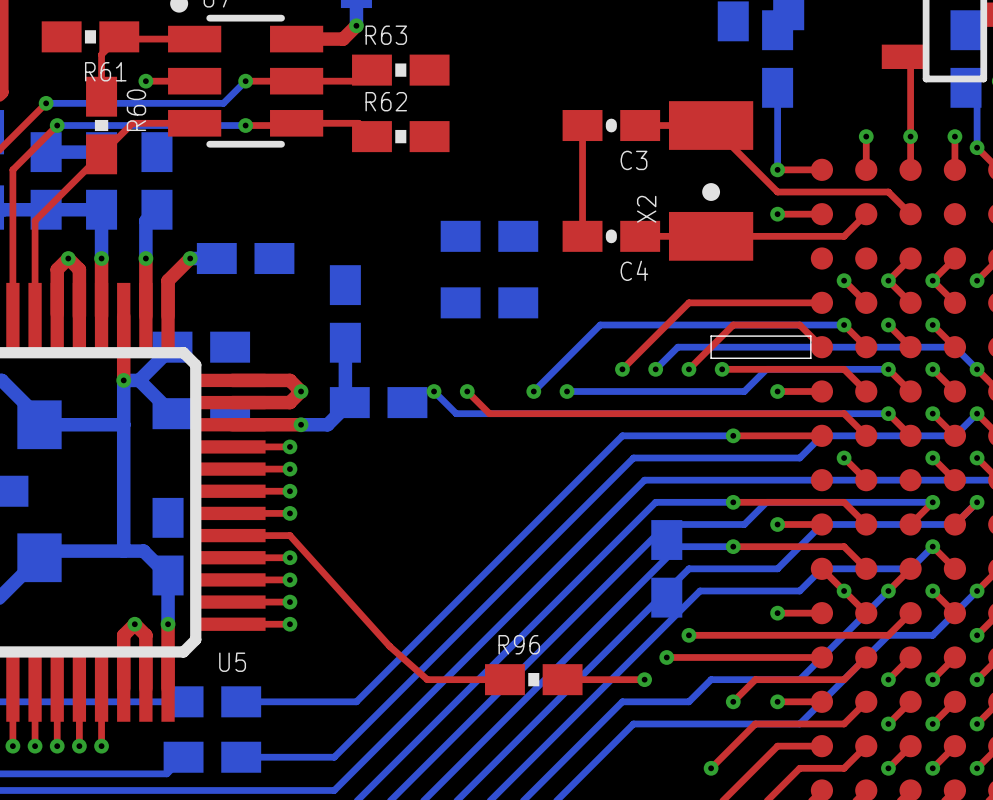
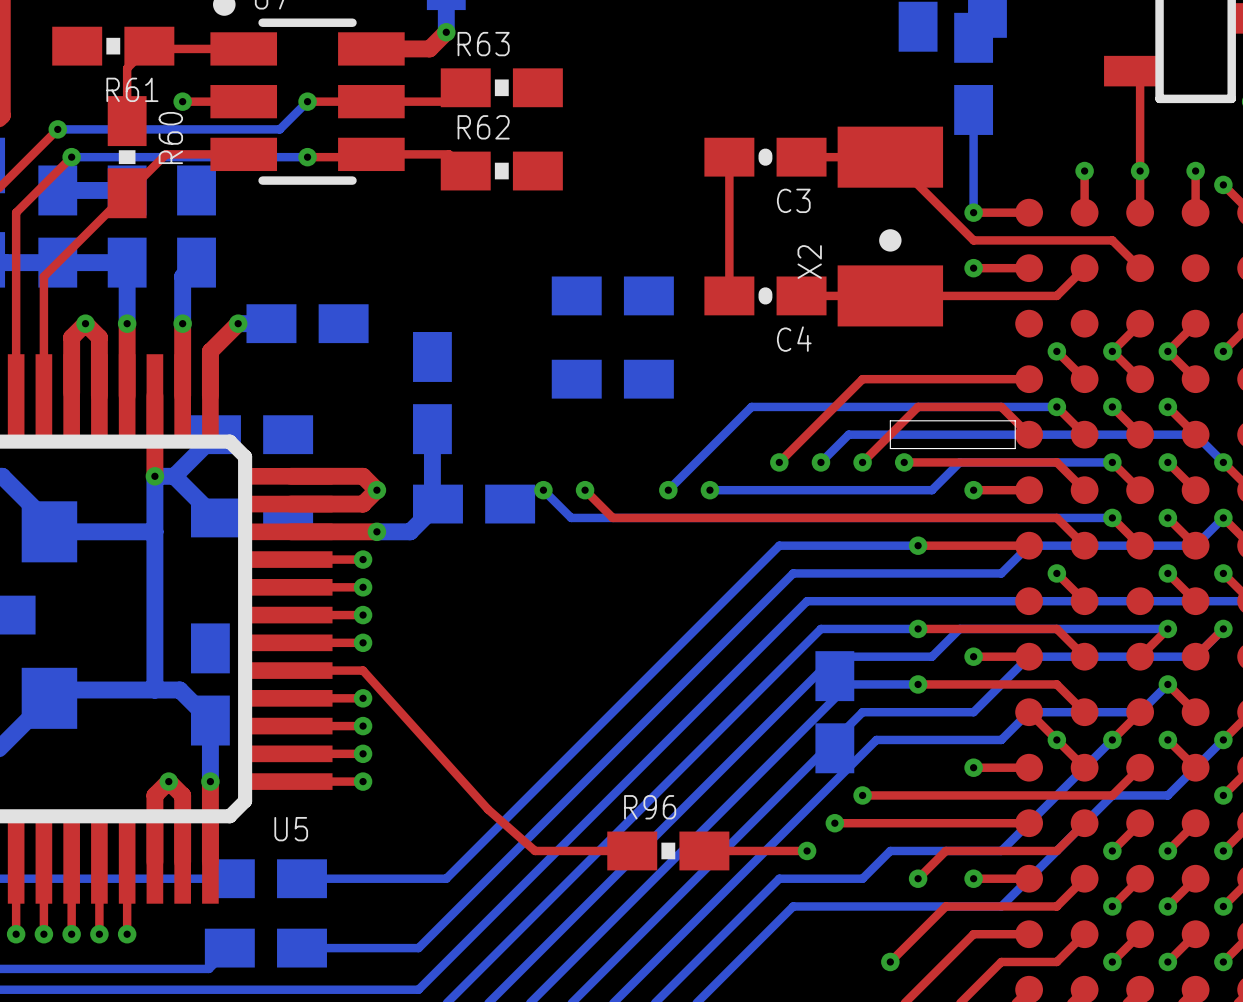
part: (966, 59) -> none
bottom track: (966, 87) (977, 98) (977, 147) -> none

